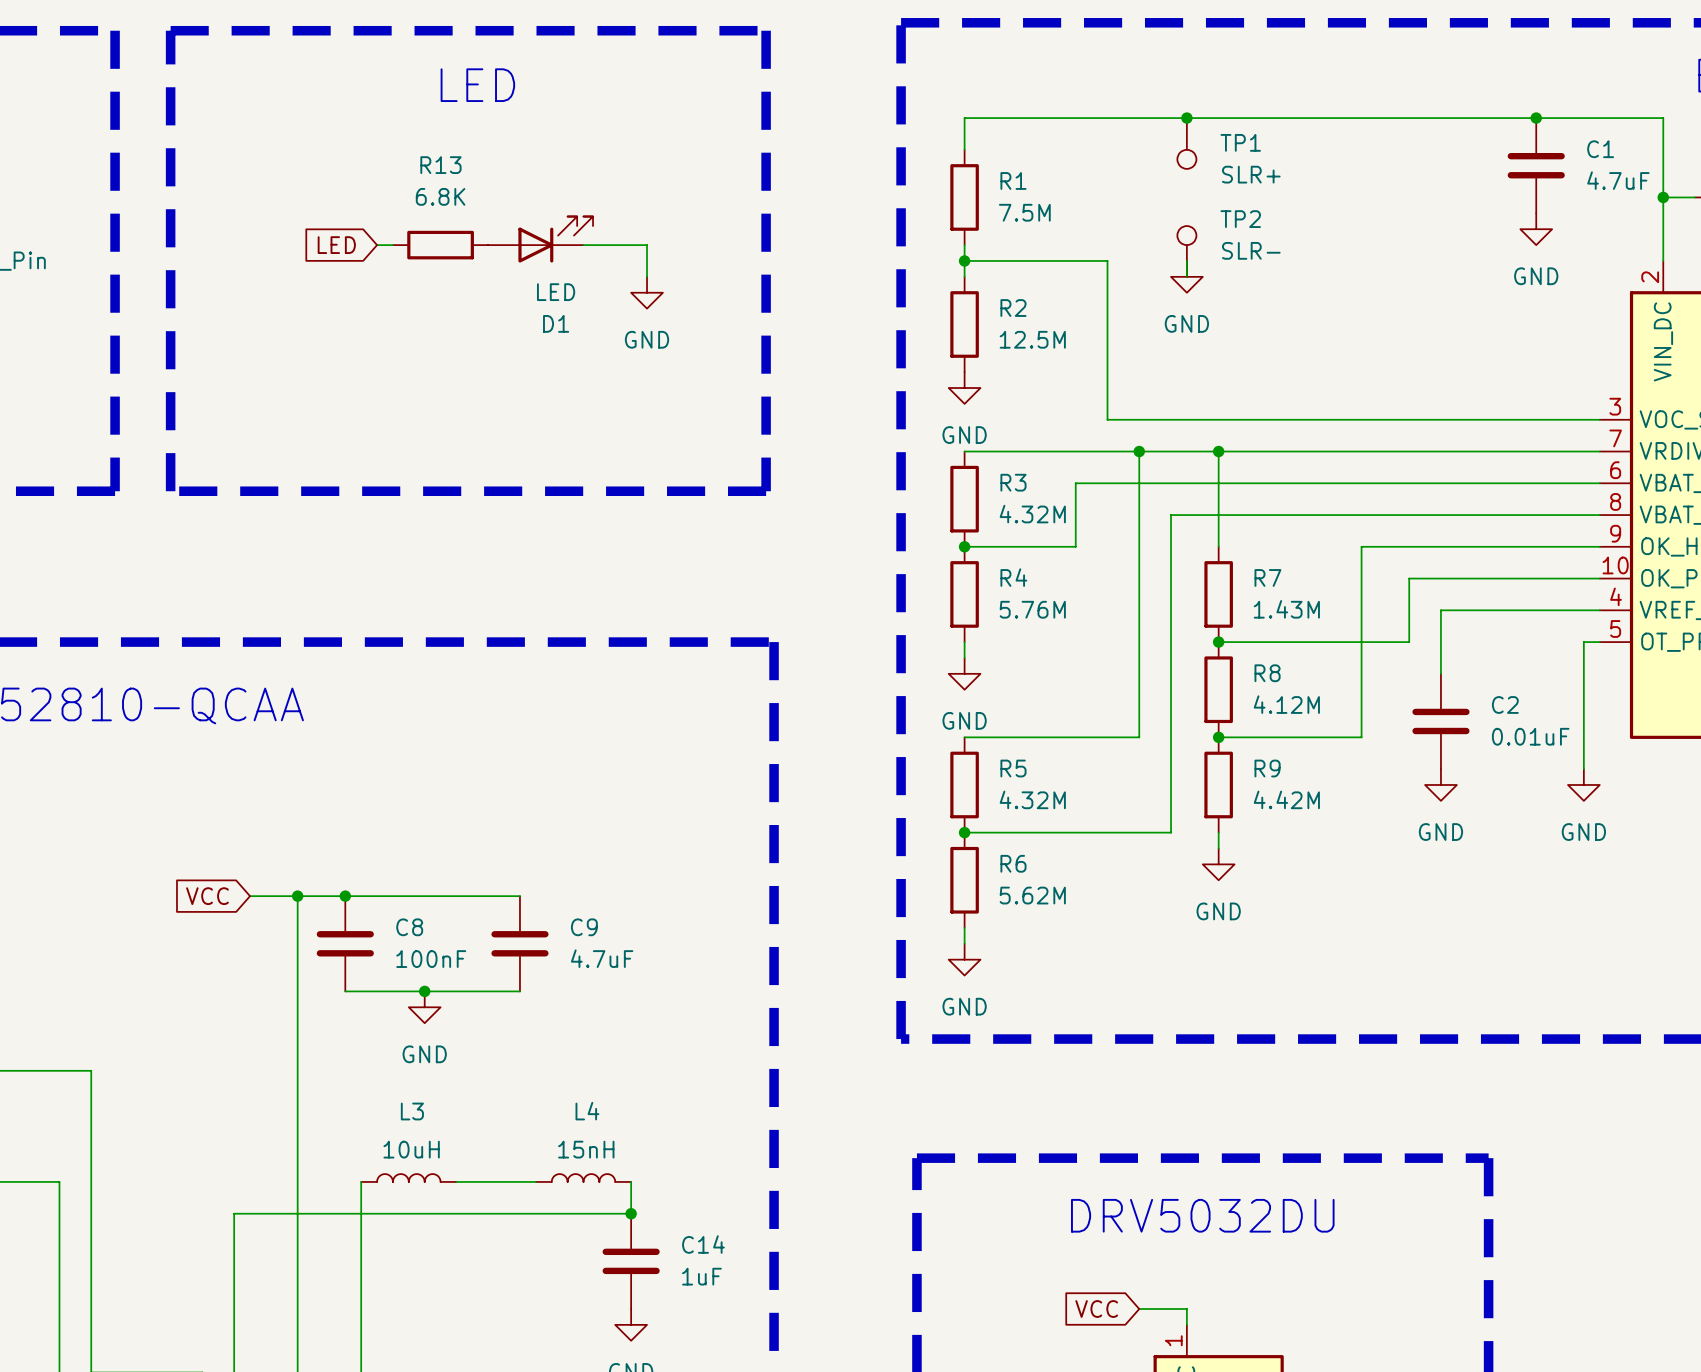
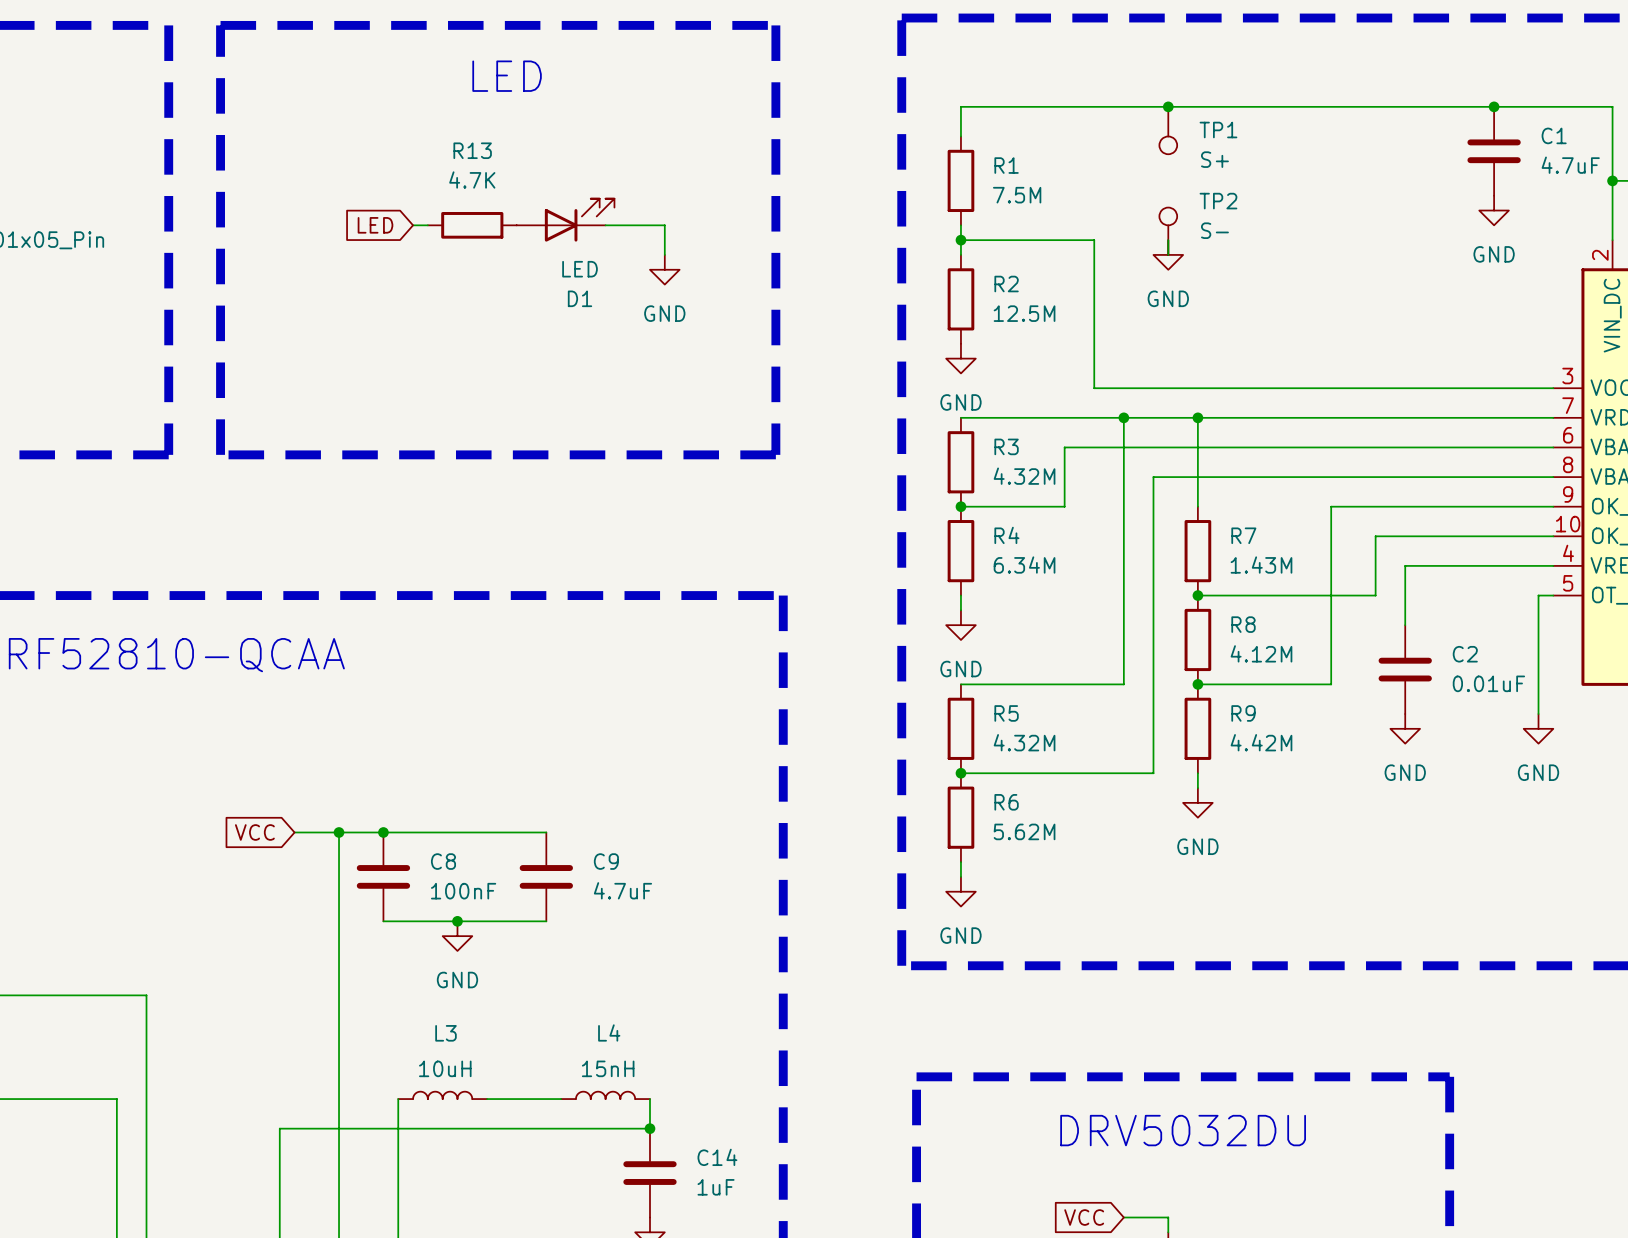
TP1 value: SLR+ (1251, 174) -> S+ (1214, 159)
R13 value: 6.8K (440, 196) -> 4.7K (472, 180)
TP2 value: SLR- (1251, 250) -> S- (1214, 230)
R4 value: 5.76M (1032, 609) -> 6.34M (1024, 565)

